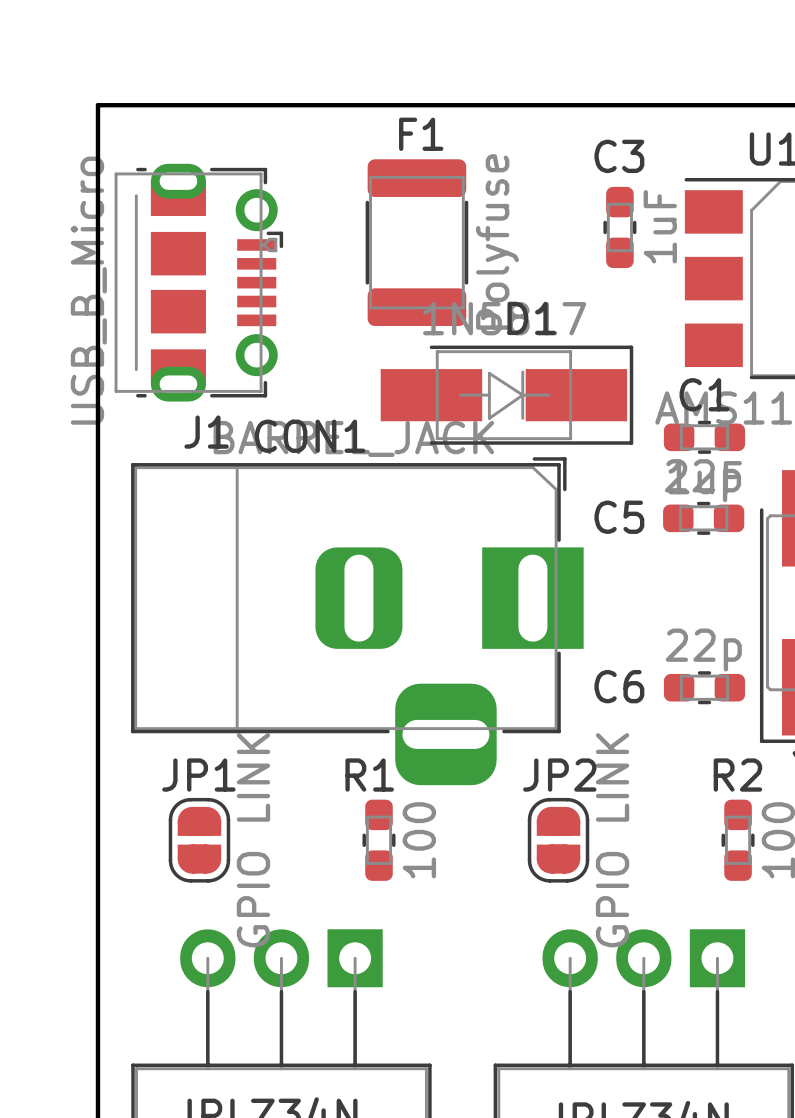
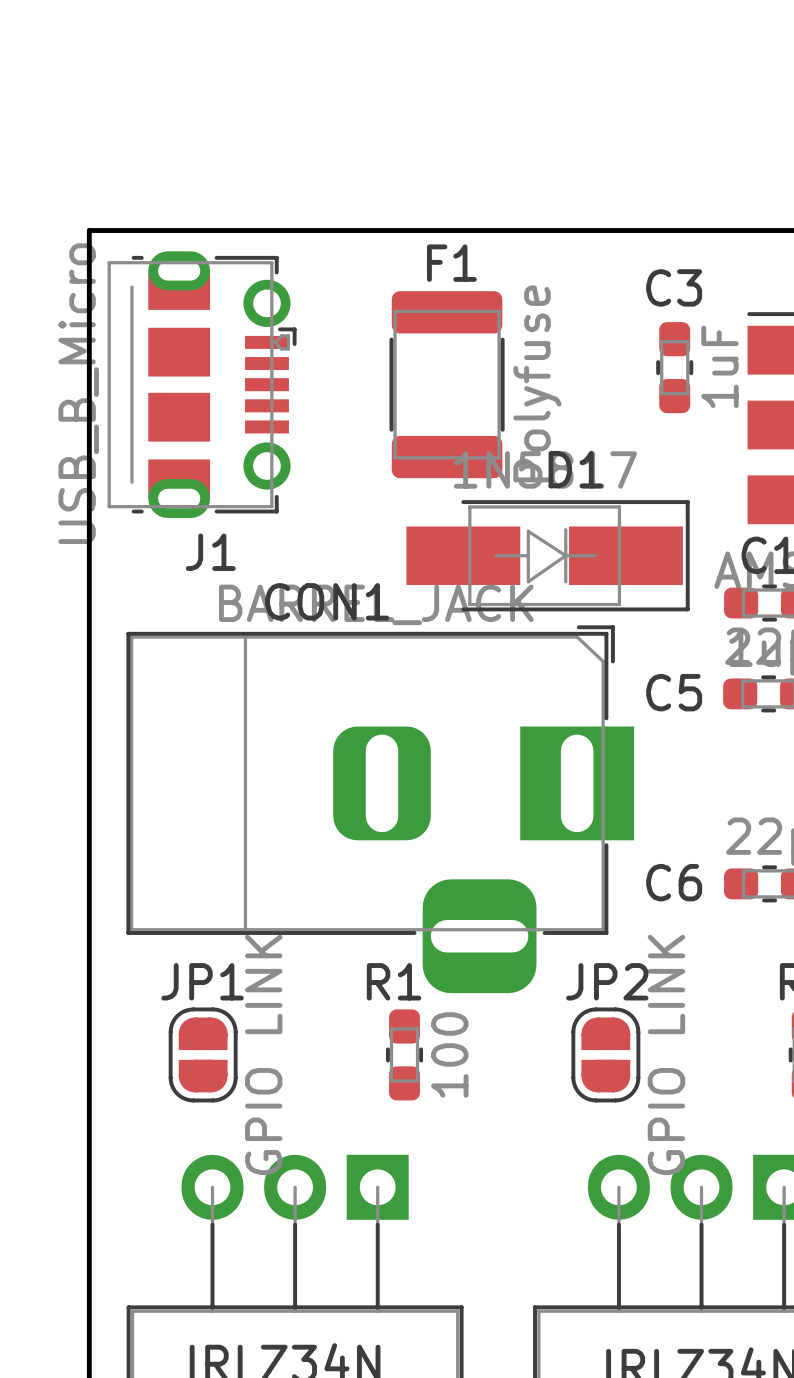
J1 position: (198, 282) -> (202, 384)

